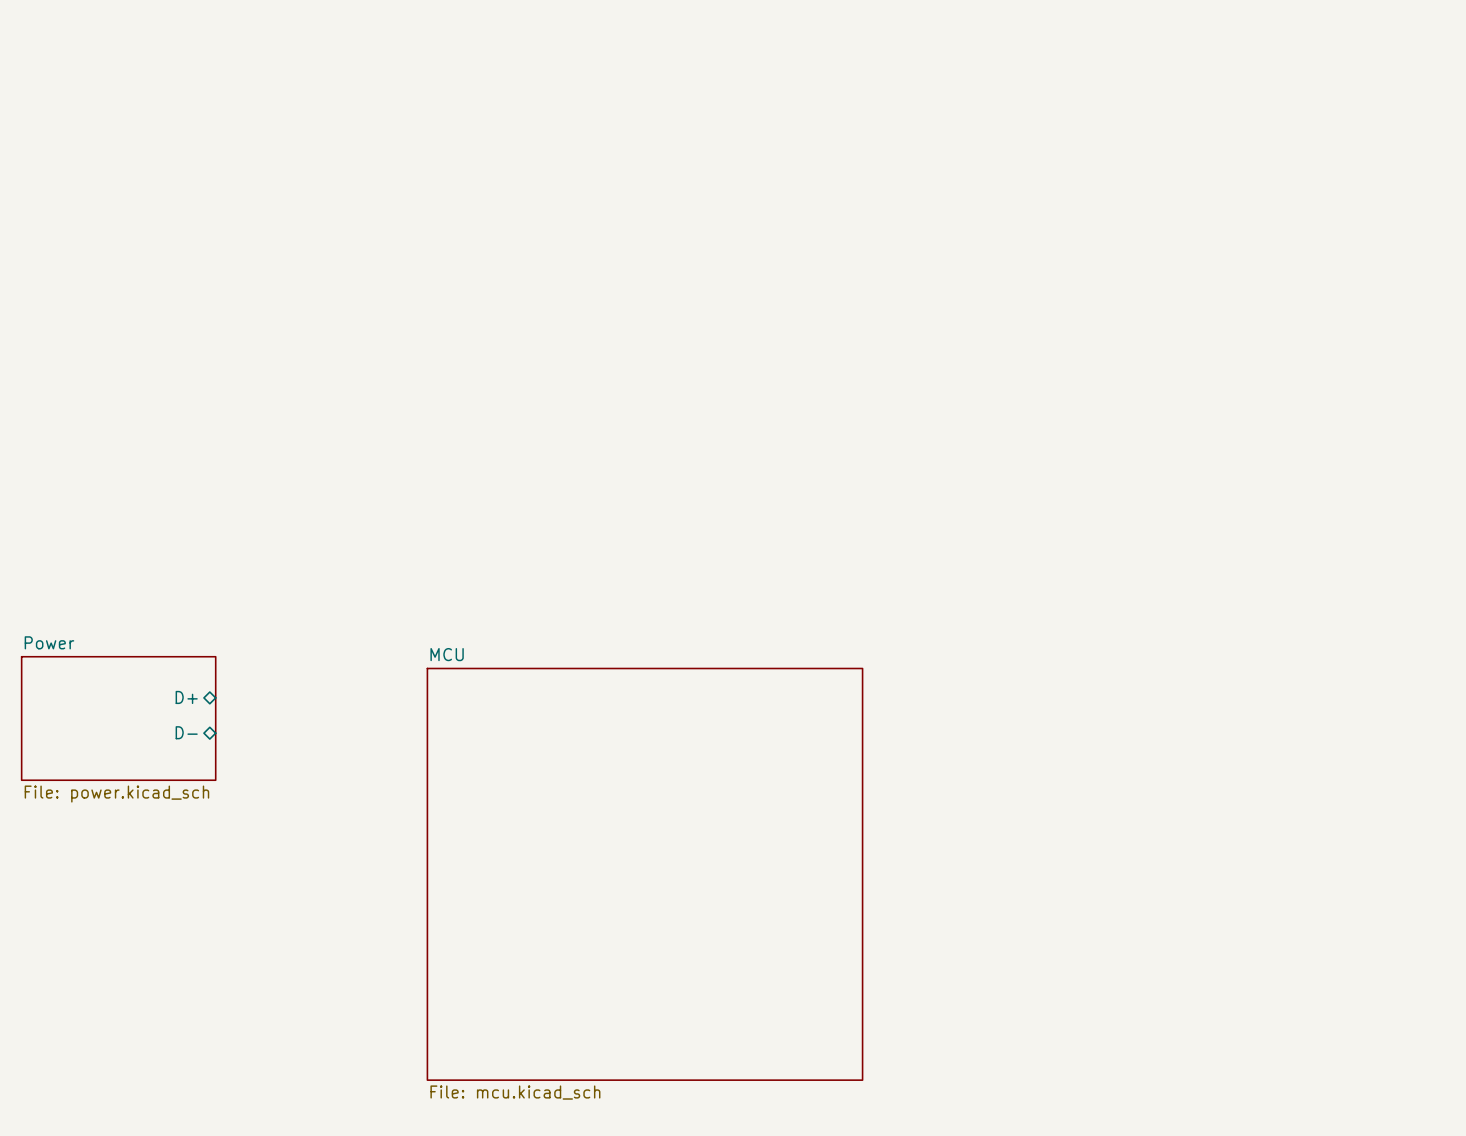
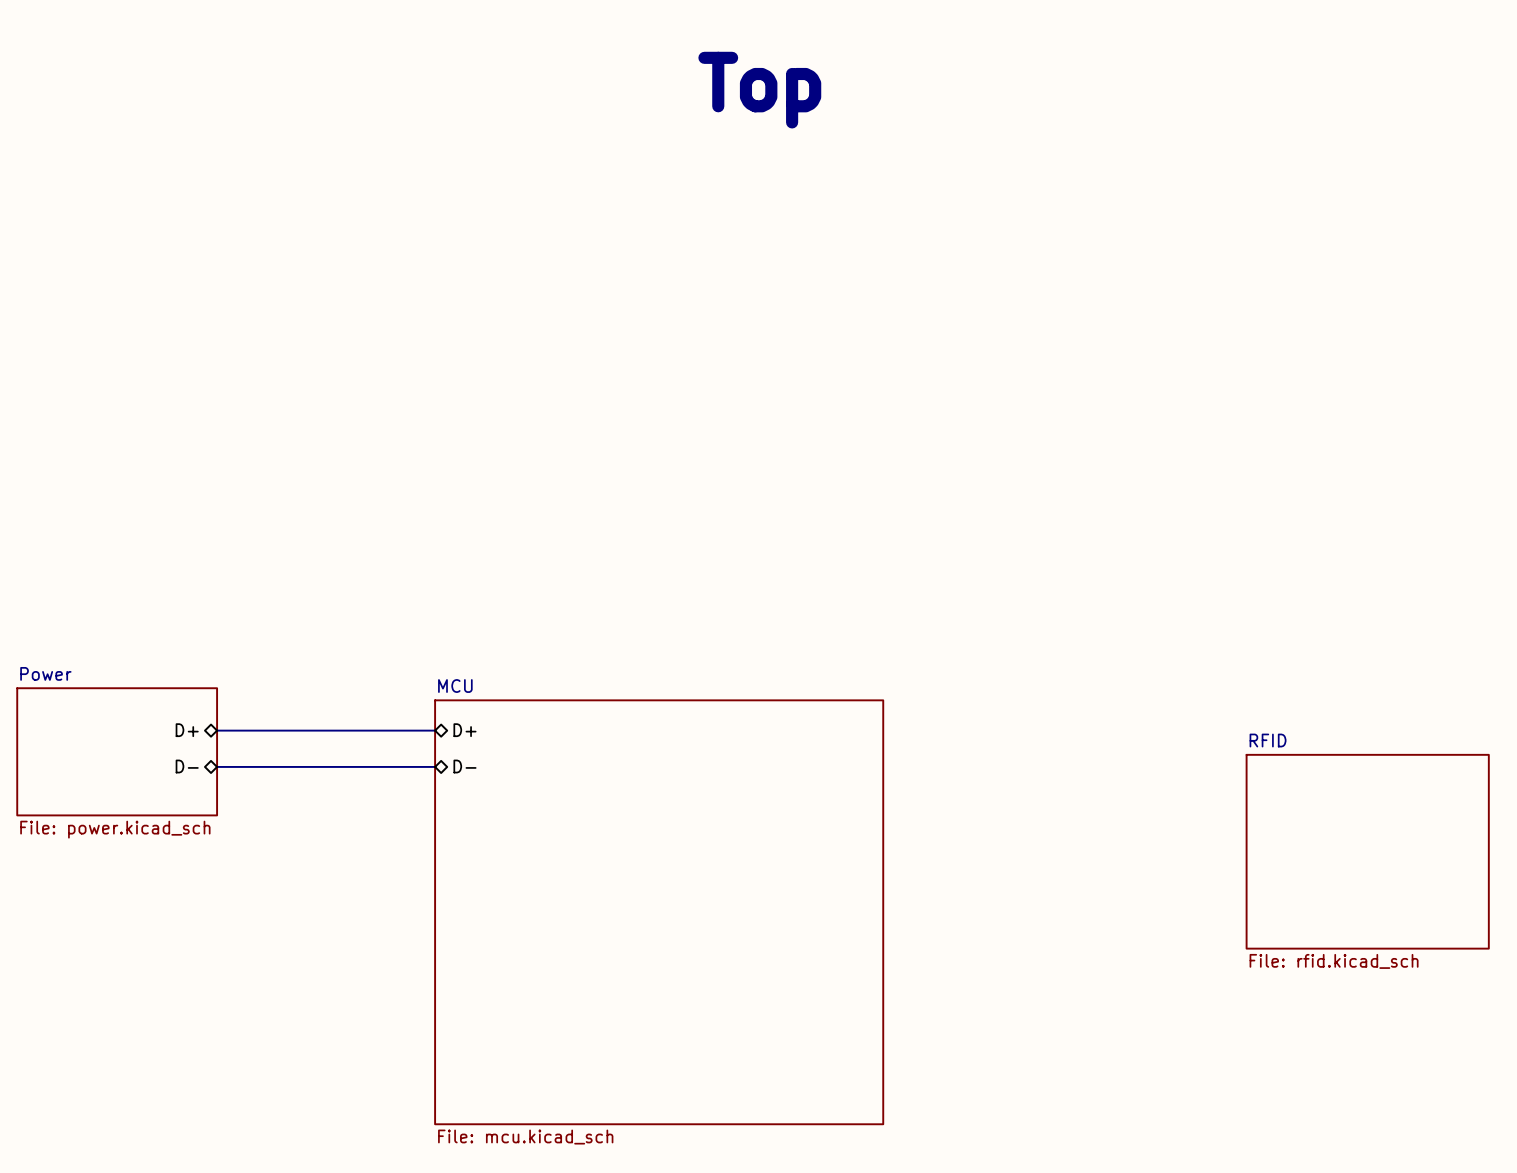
text: none -> Top (759, 90)
wire: none -> (217, 730) (435, 730)
sheet pin: none -> D+ (464, 730)
sheet pin: none -> D- (464, 766)
wire: none -> (217, 766) (435, 766)
sheet RFID: none -> File: rfid.kicad_sch (1367, 851)

